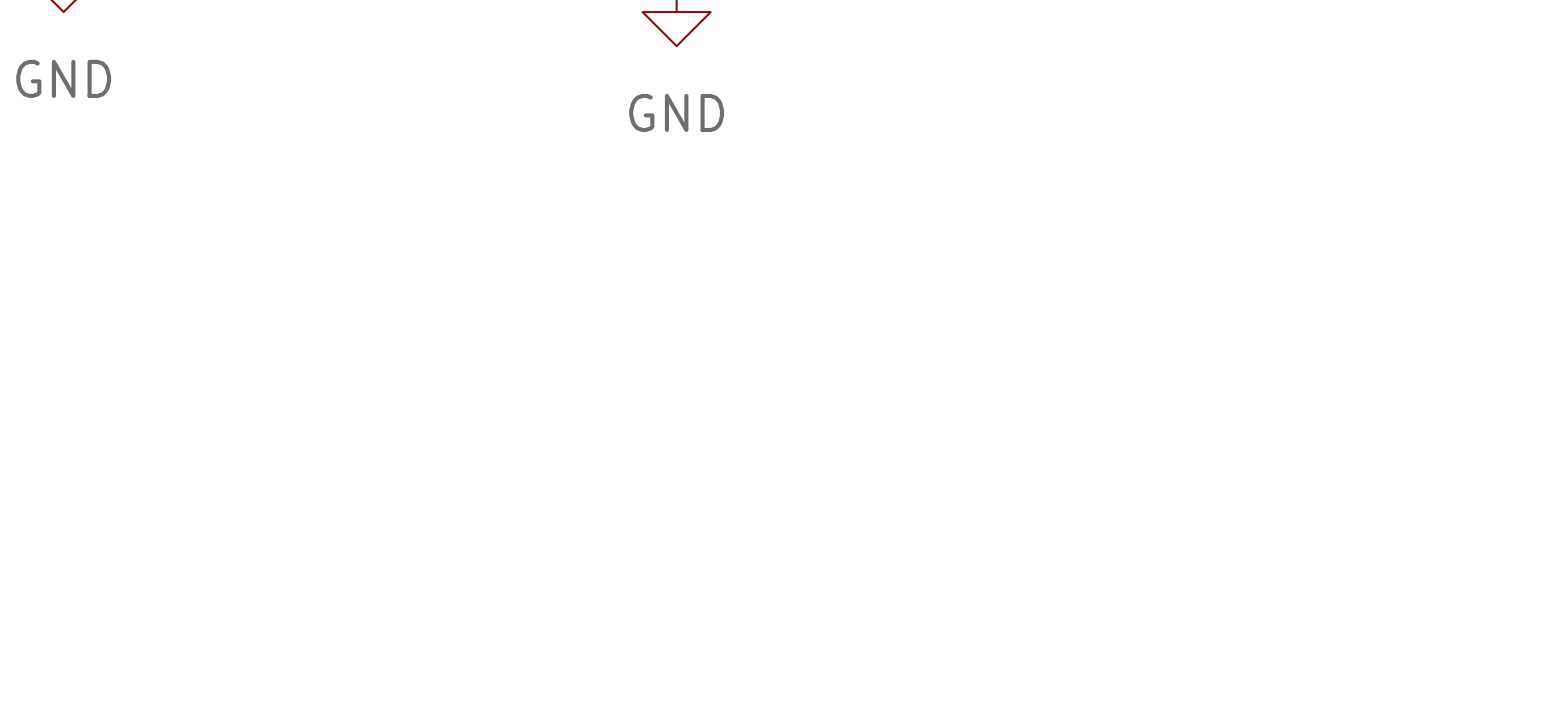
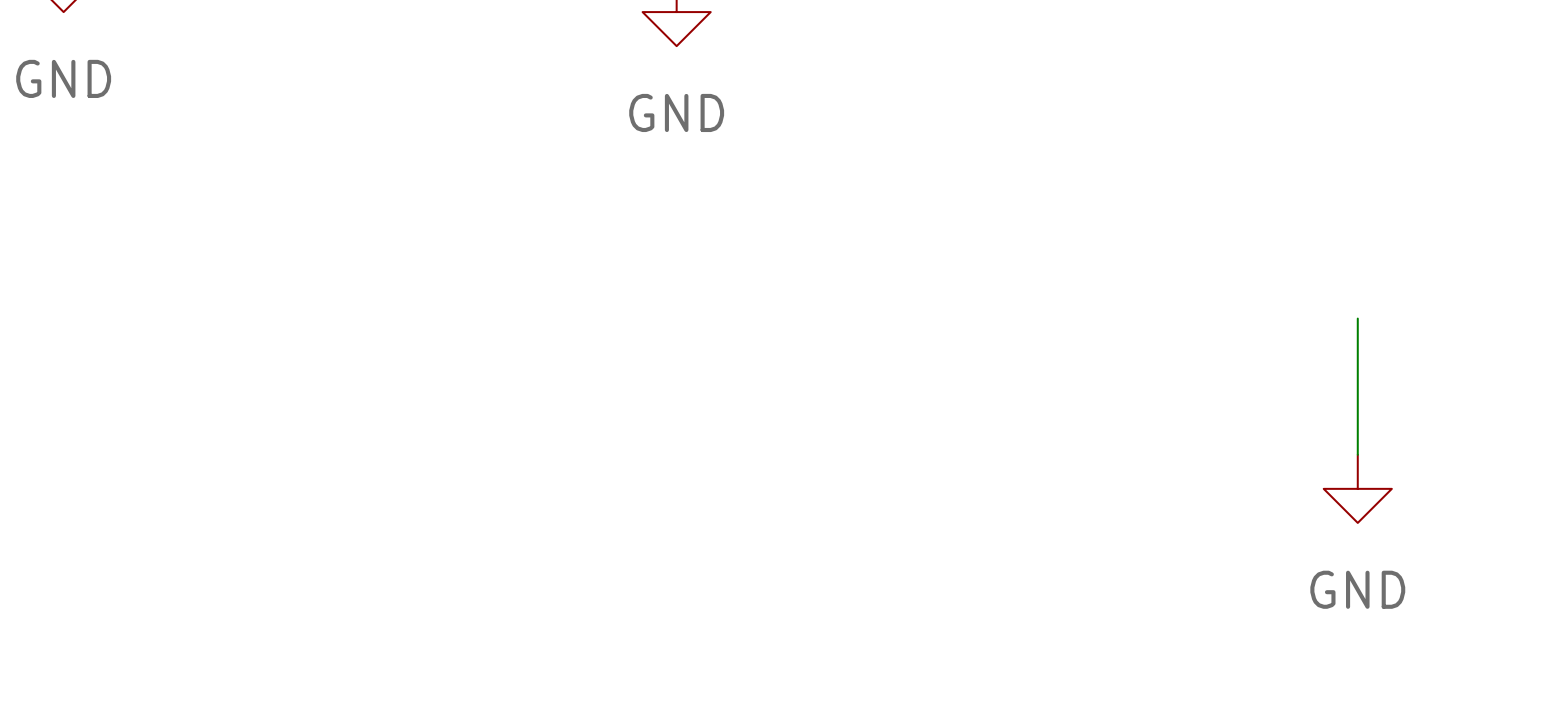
wire: none -> (1357, 318) (1357, 454)
power symbol: none -> GND (1357, 488)

